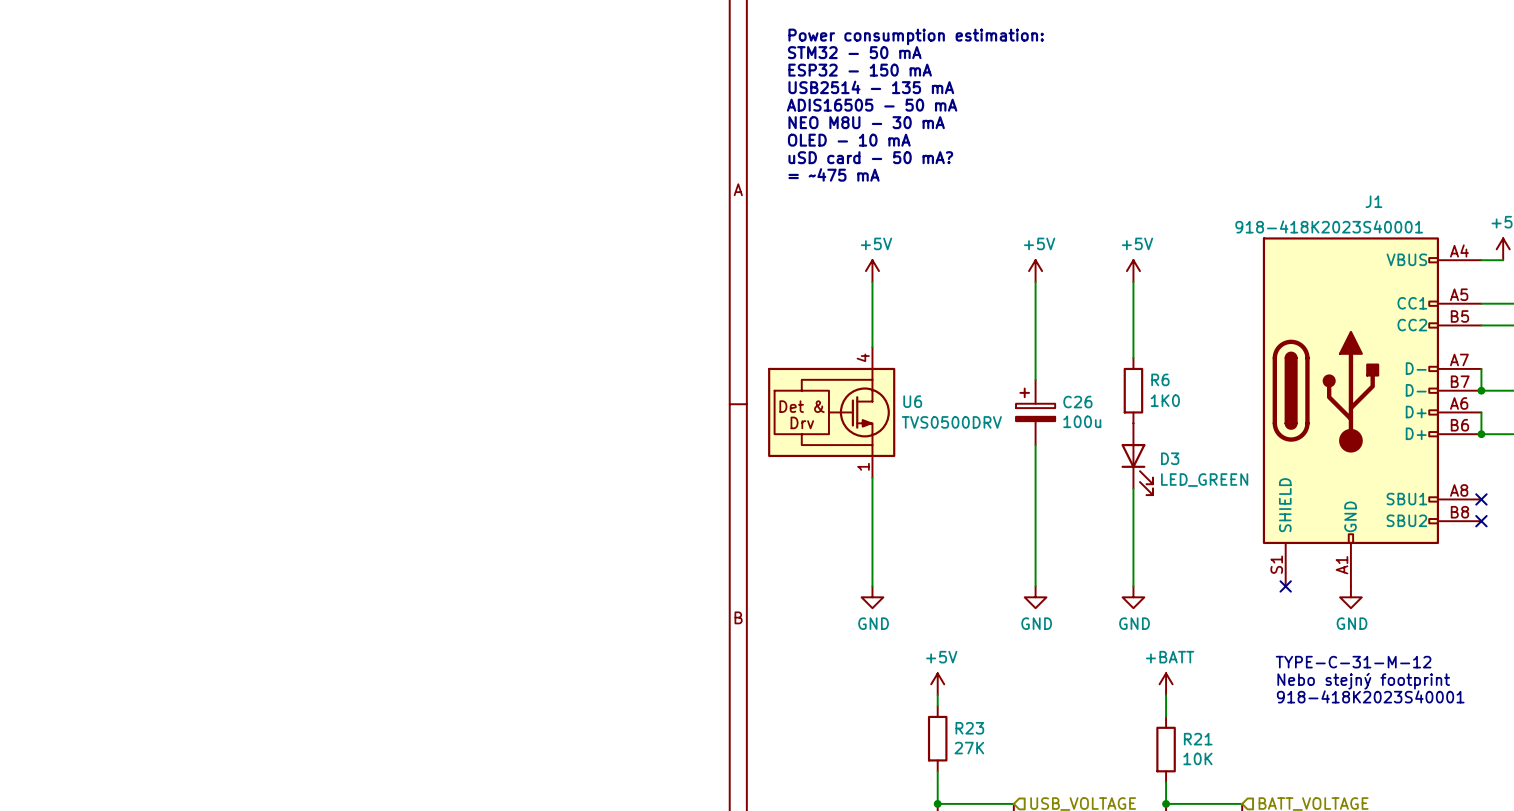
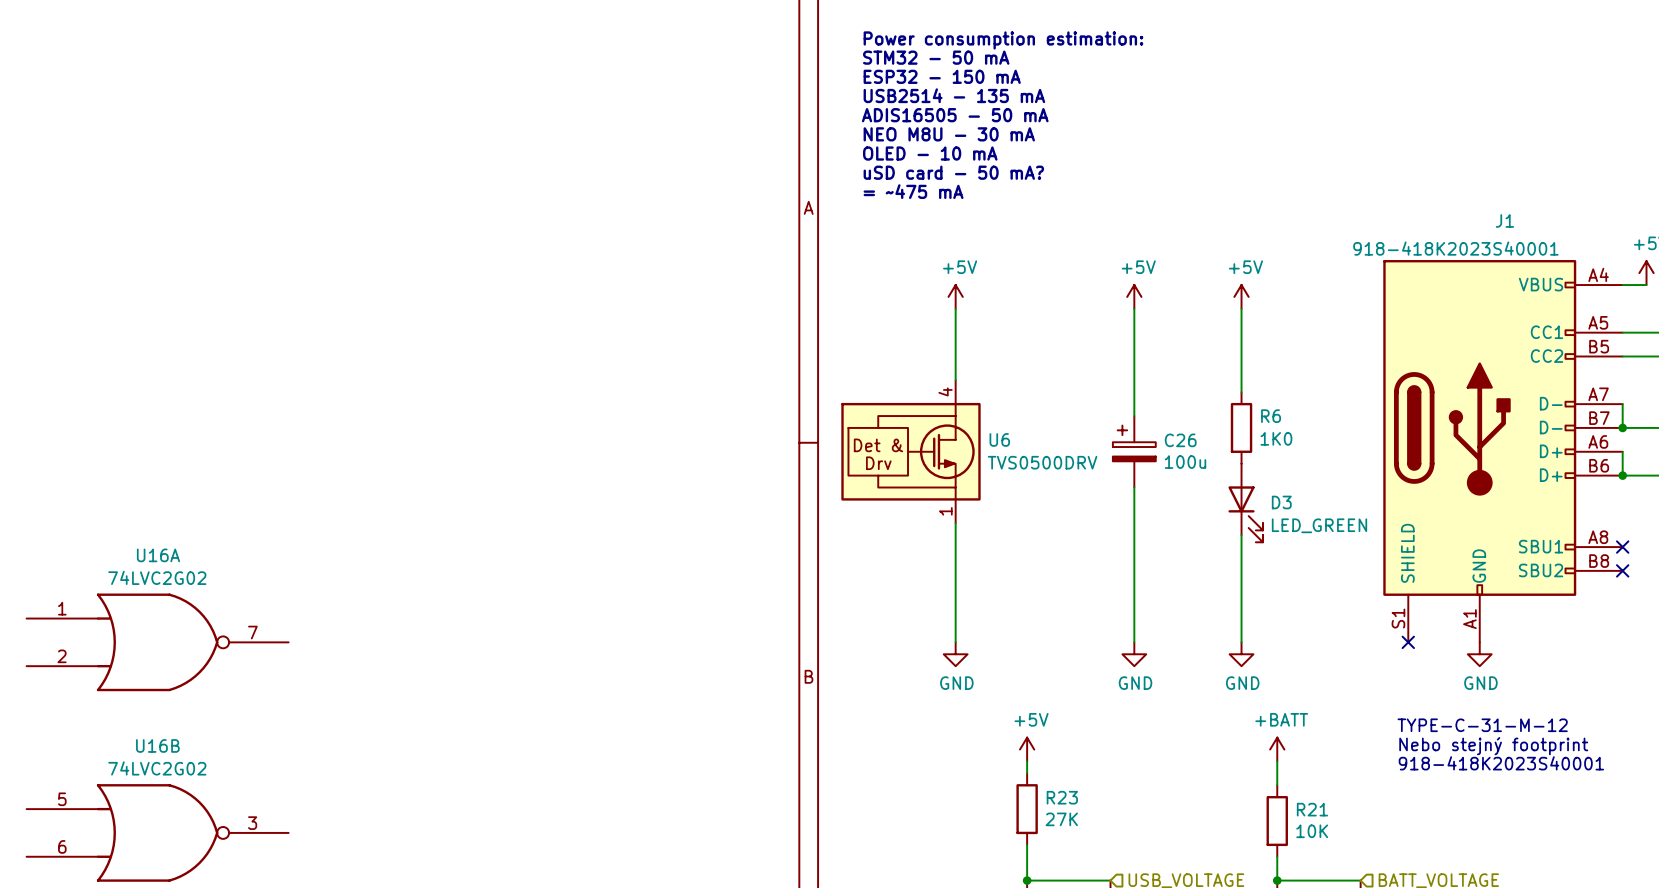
U16A: none -> 74LVC2G02 (157, 642)
U16B: none -> 74LVC2G02 (157, 832)

